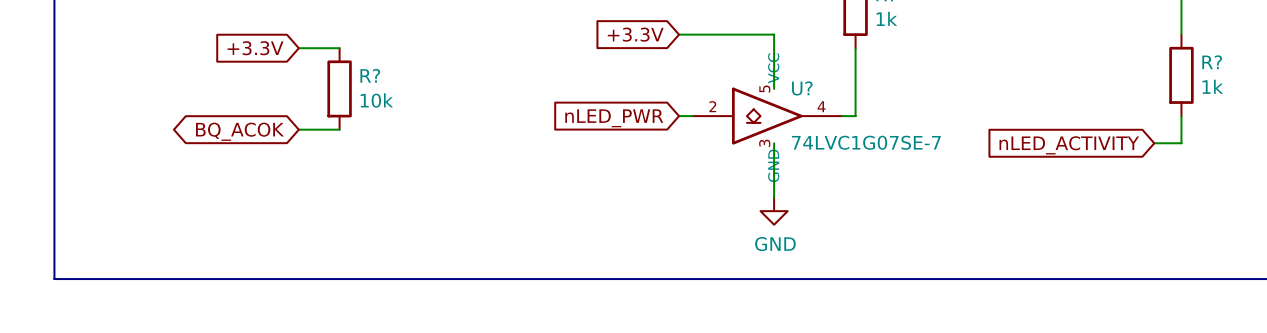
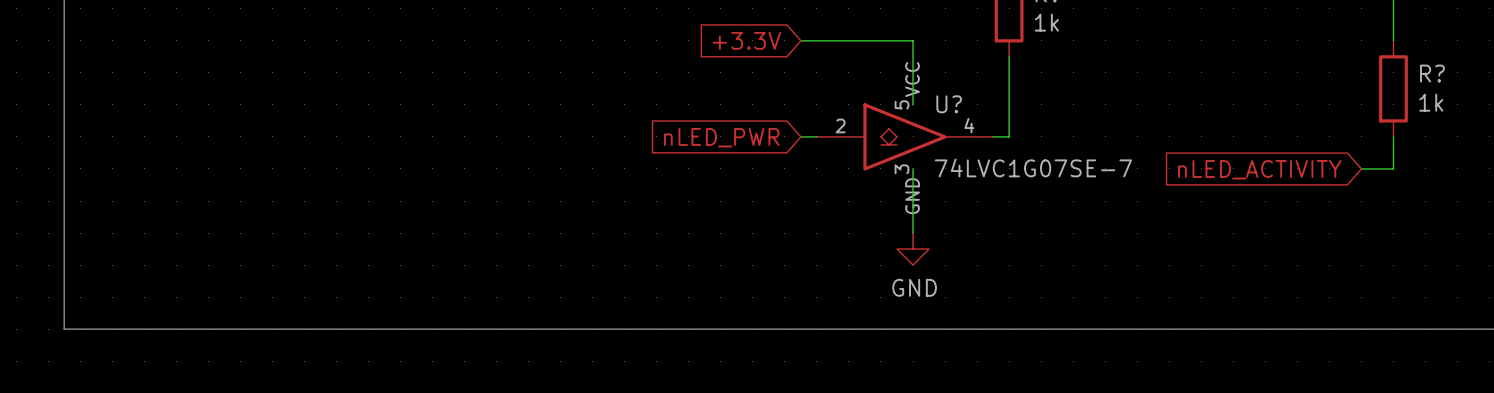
global label: +3.3V (255, 48) -> none
wire: (298, 48) (339, 48) -> none
R?: 10k (339, 88) -> none
wire: (298, 129) (339, 129) -> none
global label: BQ_ACOK (240, 131) -> none

